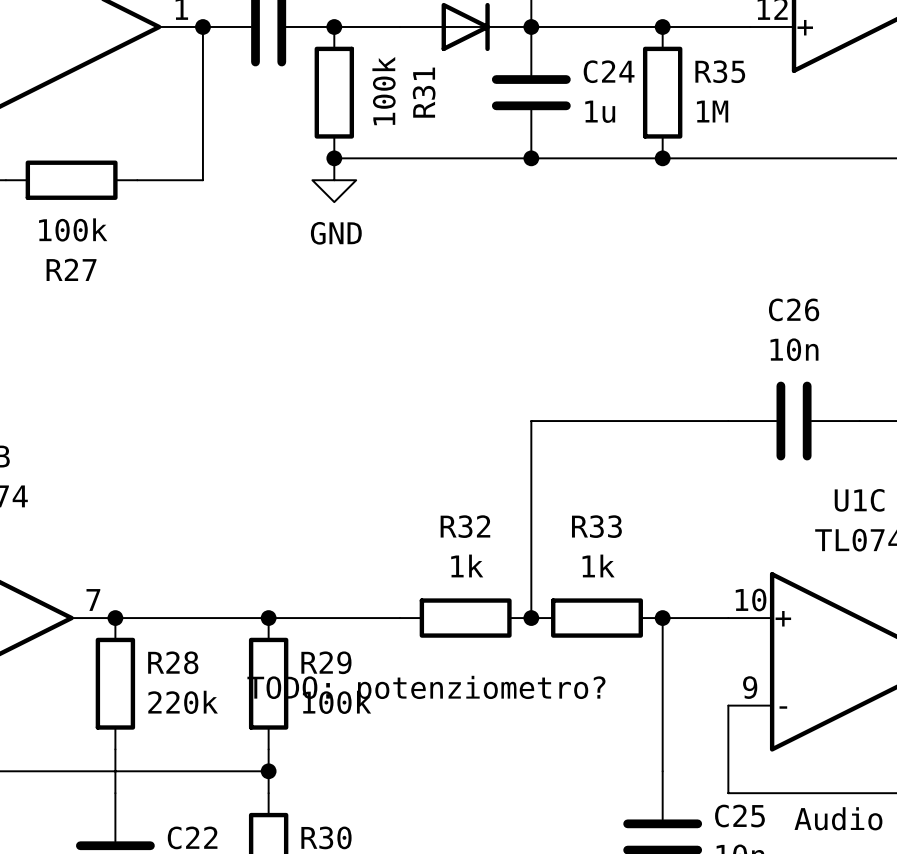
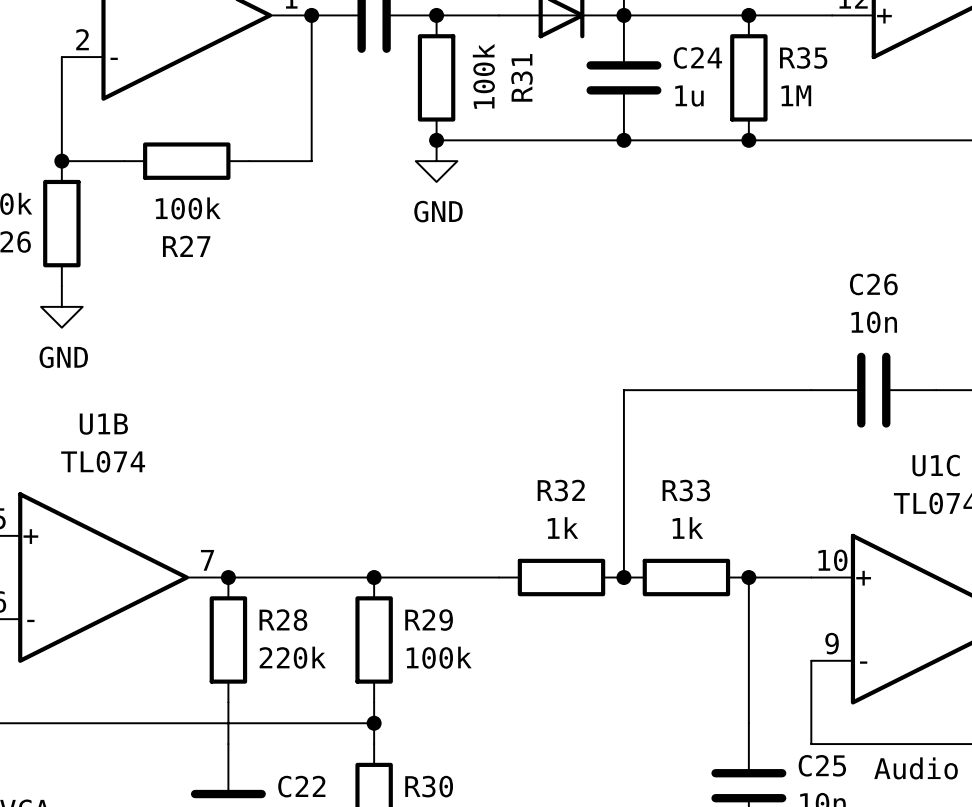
text: TODO: potenziometro? (426, 690) -> none

